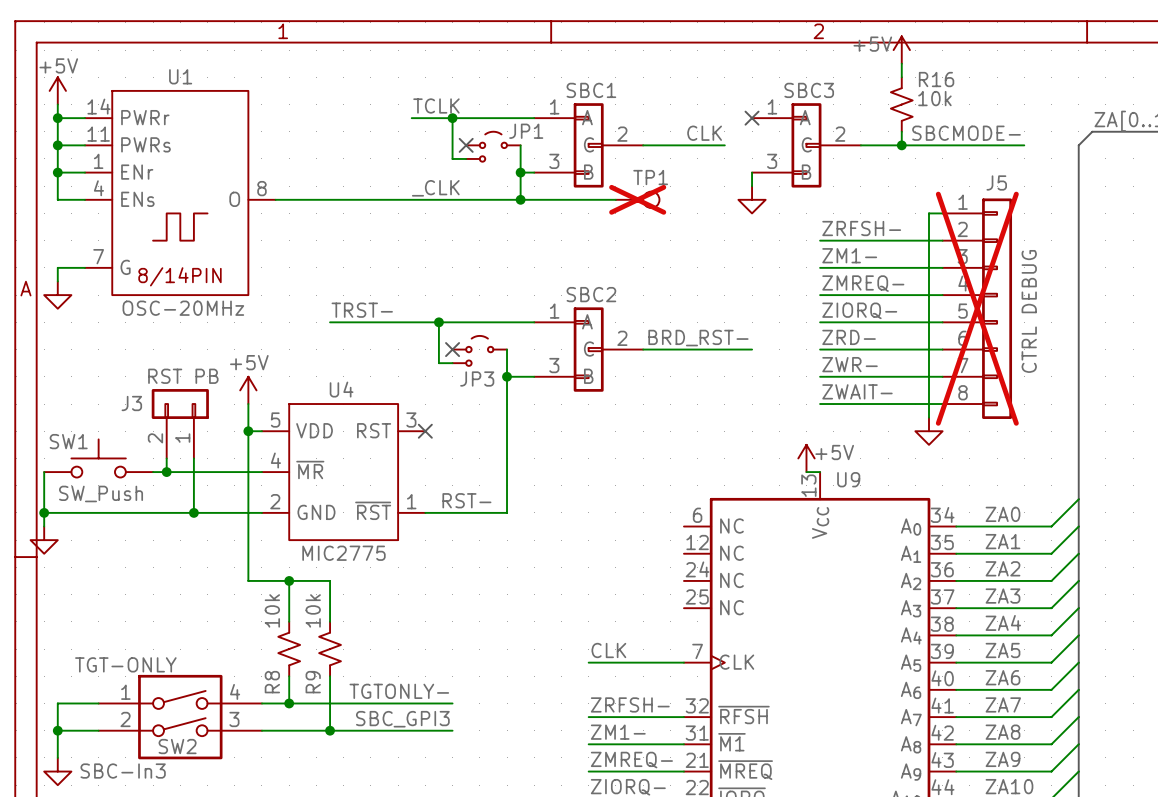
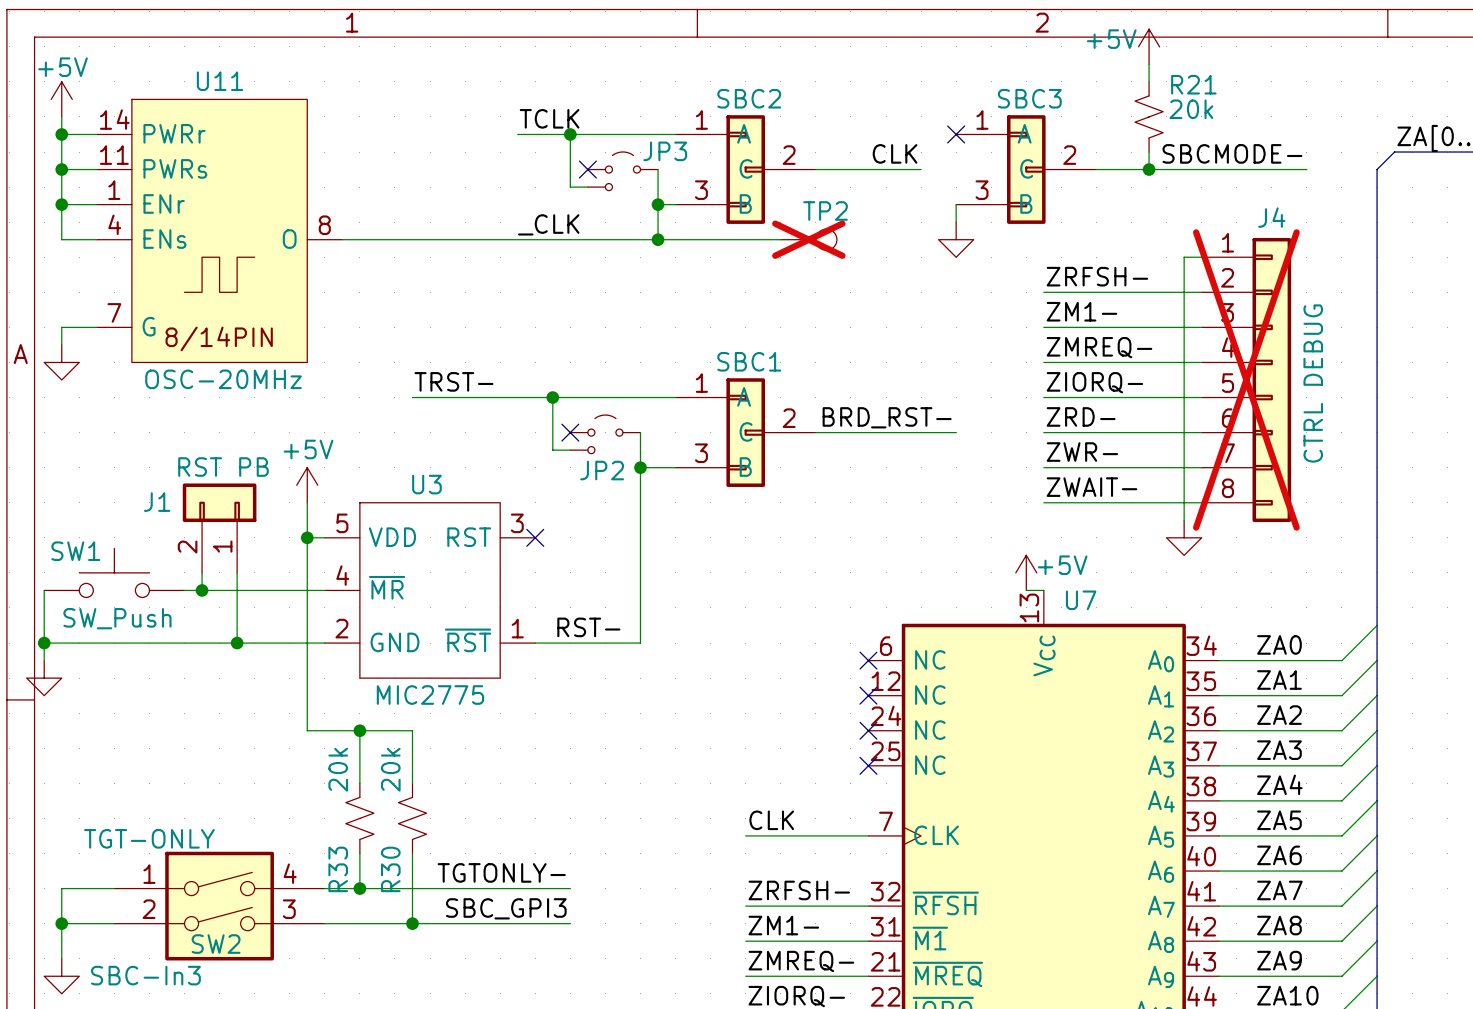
U1 name: U1 (180, 76) -> U11 (220, 81)
R16 name: R16 (936, 79) -> R21 (1193, 84)
SBC1 name: SBC1 (591, 90) -> SBC2 (749, 98)
R16 value: 10k (934, 98) -> 20k (1191, 109)
JP1 name: JP1 (526, 131) -> JP3 (665, 151)
TP1 name: TP1 (650, 177) -> TP2 (825, 210)
J5 name: J5 (996, 182) -> J4 (1271, 217)
SBC2 name: SBC2 (591, 294) -> SBC1 (749, 361)
JP3 name: JP3 (477, 378) -> JP2 (602, 470)
U4 name: U4 (341, 389) -> U3 (426, 484)
J3 name: J3 (131, 403) -> J1 (157, 502)
U9 name: U9 (848, 479) -> U7 (1081, 600)
no-connect mark: none -> (868, 660)
no-connect mark: none -> (868, 695)
no-connect mark: none -> (868, 730)
no-connect mark: none -> (868, 765)
R8 value: 10k (272, 610) -> 20k (338, 769)
R9 value: 10k (313, 610) -> 20k (390, 769)
R8 name: R8 (272, 682) -> R33 (338, 869)
R9 name: R9 (313, 682) -> R30 (390, 869)

